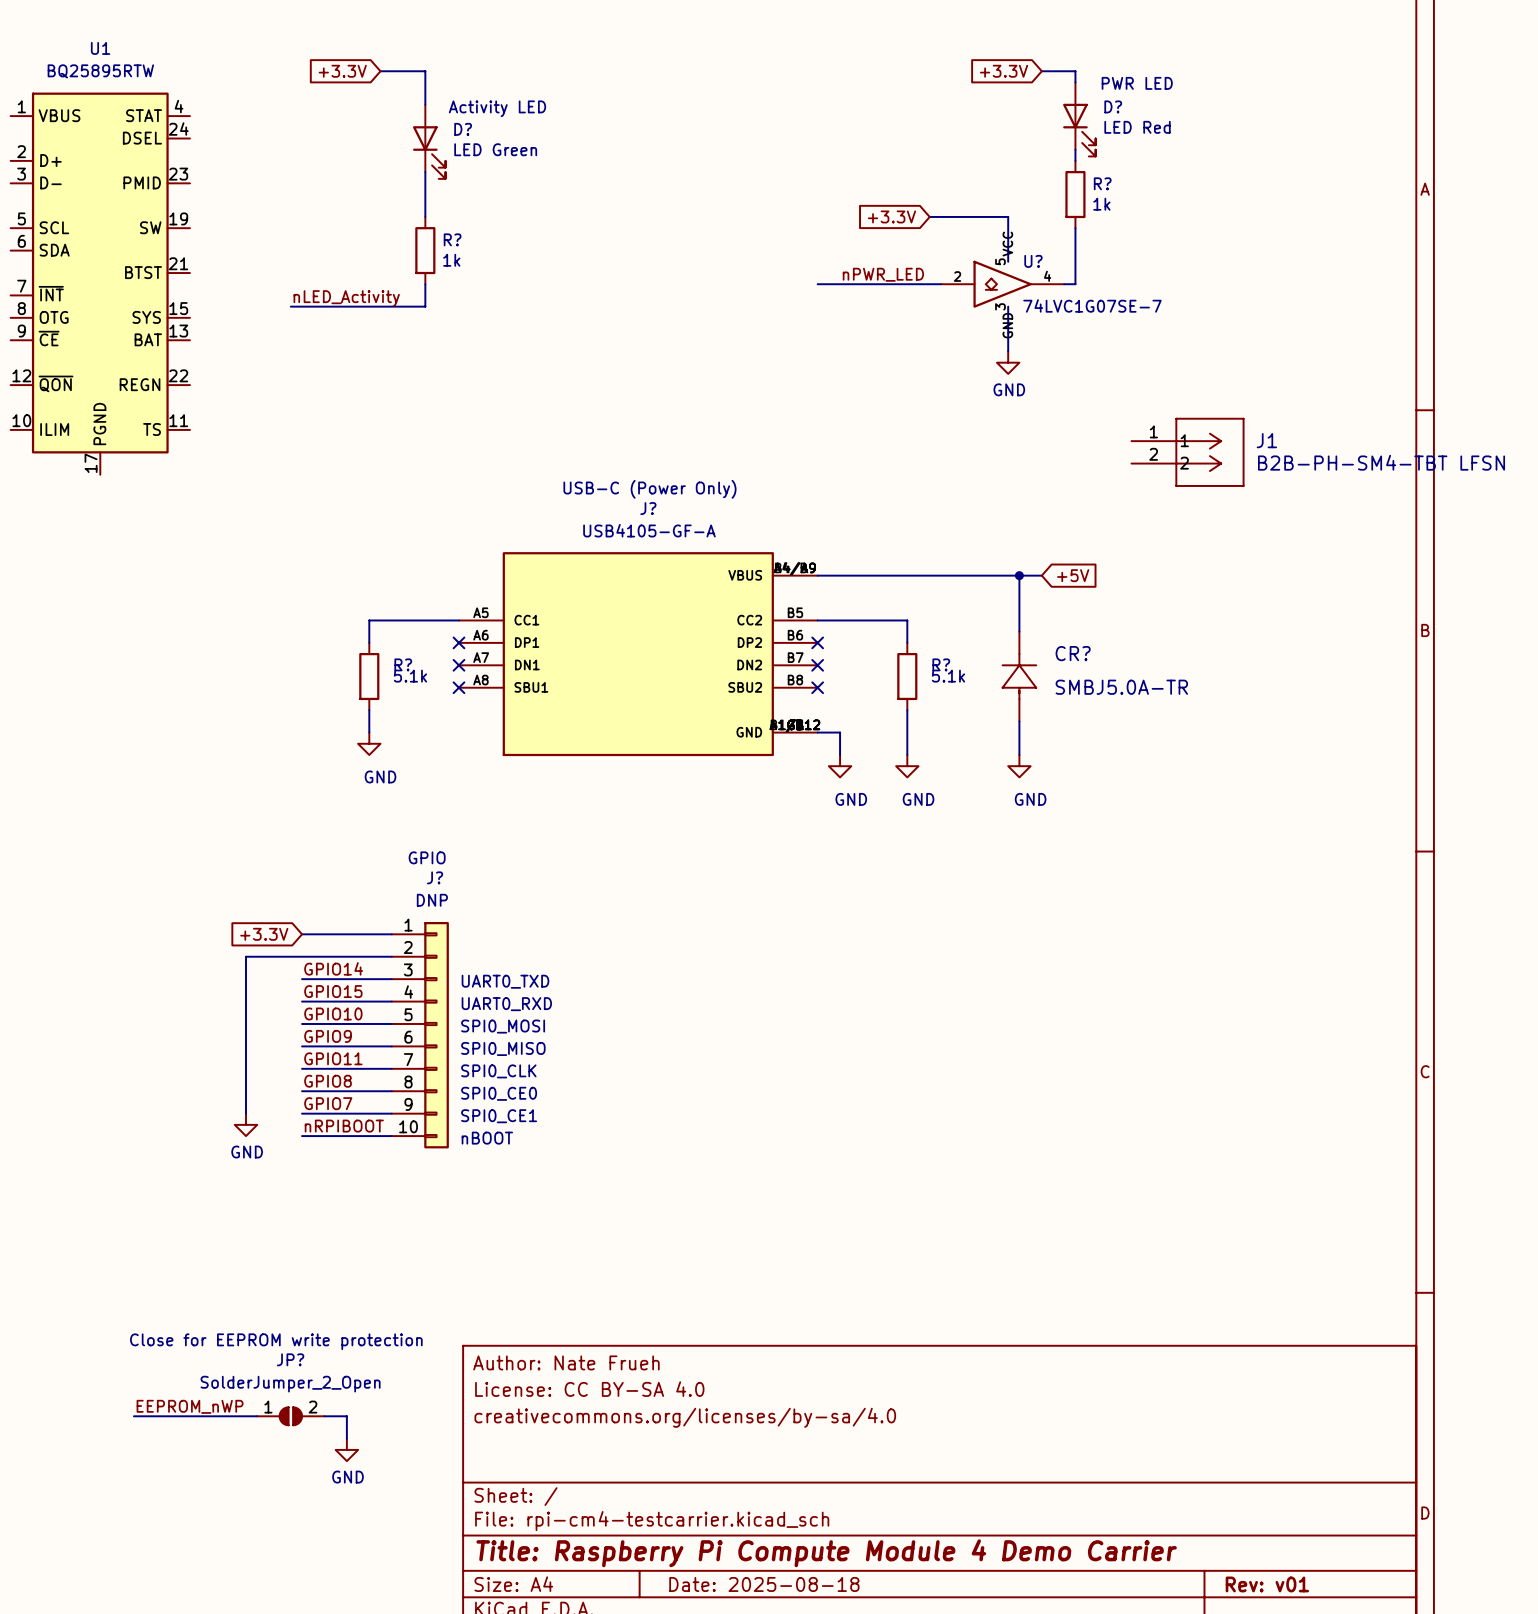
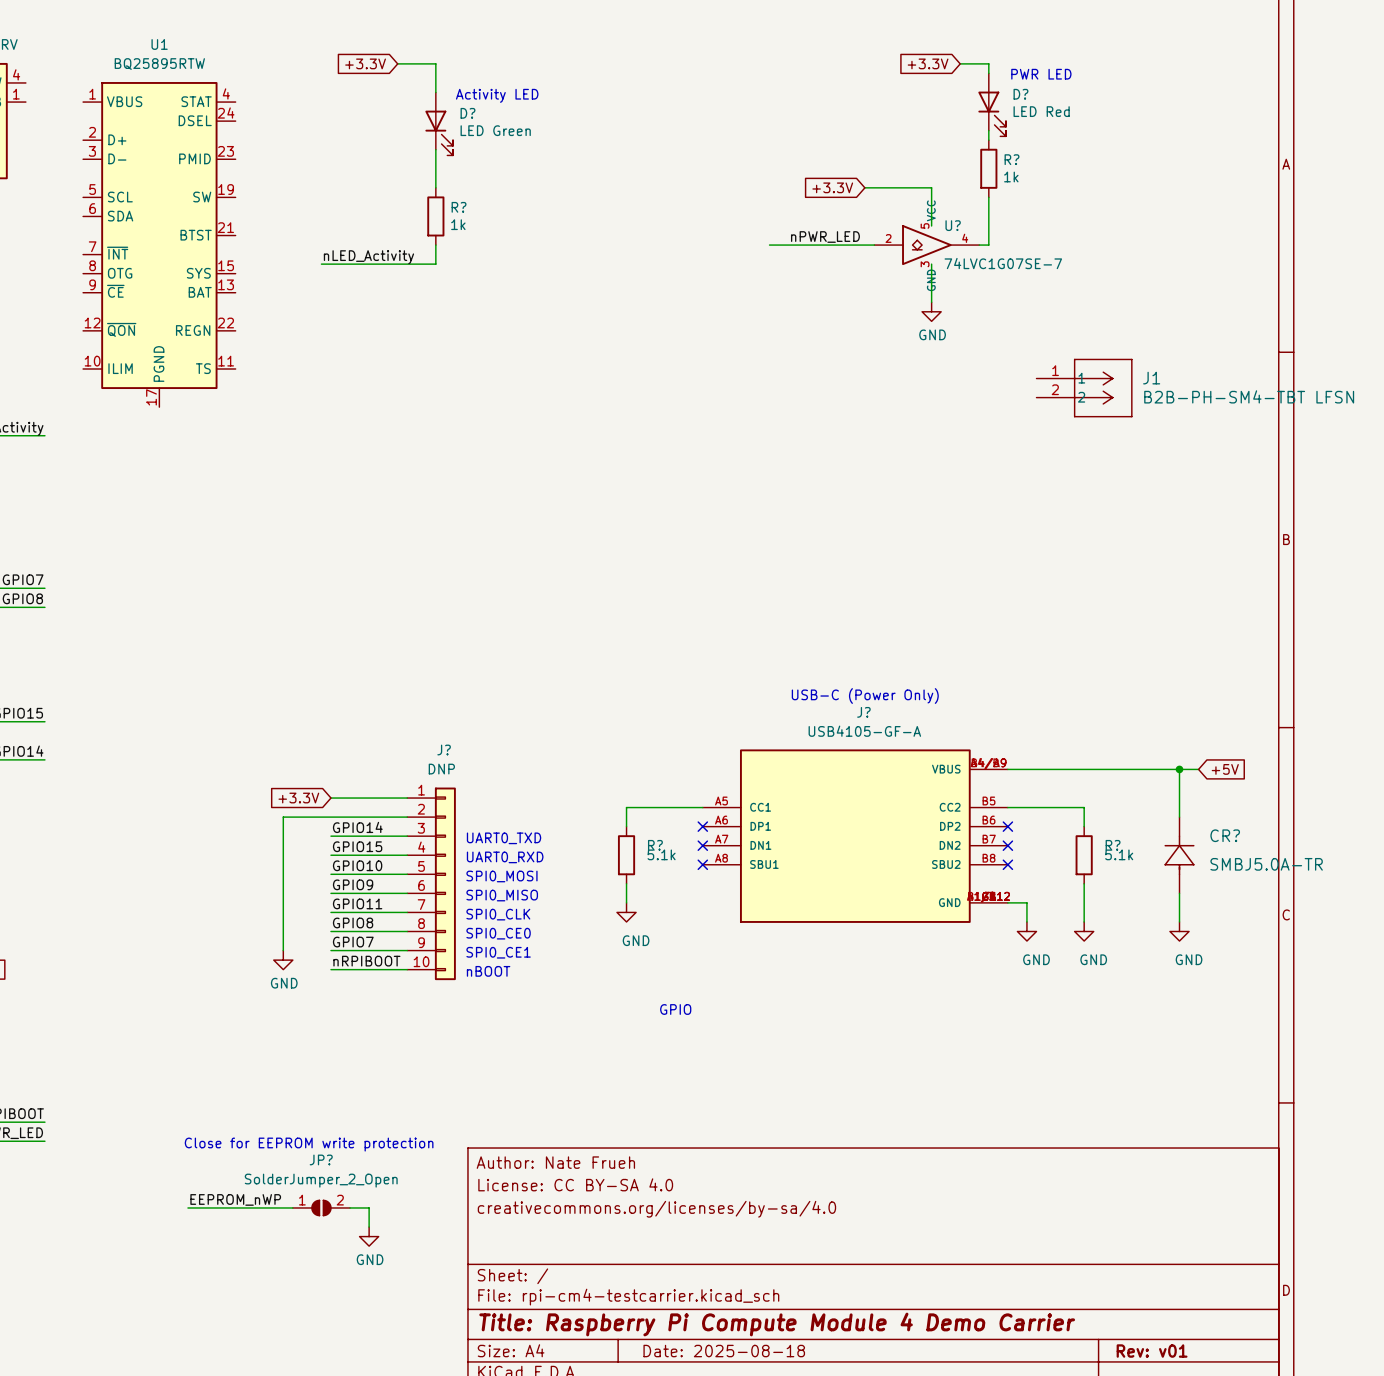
text: USB-C (Power Only) (649, 489) -> none
wire: (817, 575) (1041, 575) -> none
wire: (1019, 575) (1019, 631) -> none
junction: (1019, 575) -> none
global label: +5V (1073, 575) -> none
wire: (458, 620) (369, 620) (369, 642) -> none
wire: (817, 620) (907, 620) (907, 642) -> none
no-connect mark: (458, 642) -> none
no-connect mark: (817, 642) -> none
J?: USB4105-GF-A (638, 654) -> none
no-connect mark: (458, 665) -> none
no-connect mark: (817, 665) -> none
R?: 5.1k (369, 676) -> none
R?: 5.1k (907, 676) -> none
CR?: SMBJ5.0A-TR (1019, 676) -> none
no-connect mark: (458, 687) -> none
no-connect mark: (817, 687) -> none
wire: (369, 710) (369, 732) -> none
wire: (907, 710) (907, 754) -> none
wire: (1019, 721) (1019, 754) -> none
wire: (817, 732) (840, 732) (840, 754) -> none
power symbol: GND (369, 743) -> none
power symbol: GND (840, 766) -> none
power symbol: GND (907, 766) -> none
power symbol: GND (1019, 766) -> none
text: none -> USB-C (Power Only) (865, 696)
text: GPIO (427, 857) -> none
wire: none -> (1007, 769) (1198, 769)
wire: none -> (1179, 769) (1179, 817)
junction: none -> (1179, 769)
global label: none -> +5V (1225, 769)
wire: none -> (702, 807) (626, 807) (626, 826)
wire: none -> (1007, 807) (1084, 807) (1084, 826)
no-connect mark: none -> (702, 826)
no-connect mark: none -> (1007, 826)
J?: none -> USB4105-GF-A (855, 836)
no-connect mark: none -> (702, 845)
no-connect mark: none -> (1007, 845)
R?: none -> 5.1k (626, 855)
R?: none -> 5.1k (1084, 855)
CR?: none -> SMBJ5.0A-TR (1179, 855)
no-connect mark: none -> (702, 864)
no-connect mark: none -> (1007, 864)
wire: none -> (626, 883) (626, 902)
wire: none -> (1084, 883) (1084, 921)
wire: none -> (1179, 893) (1179, 921)
wire: none -> (1007, 902) (1026, 902) (1026, 921)
power symbol: none -> GND (626, 912)
power symbol: none -> GND (1026, 931)
power symbol: none -> GND (1084, 931)
power symbol: none -> GND (1179, 931)
text: none -> GPIO (675, 1009)

